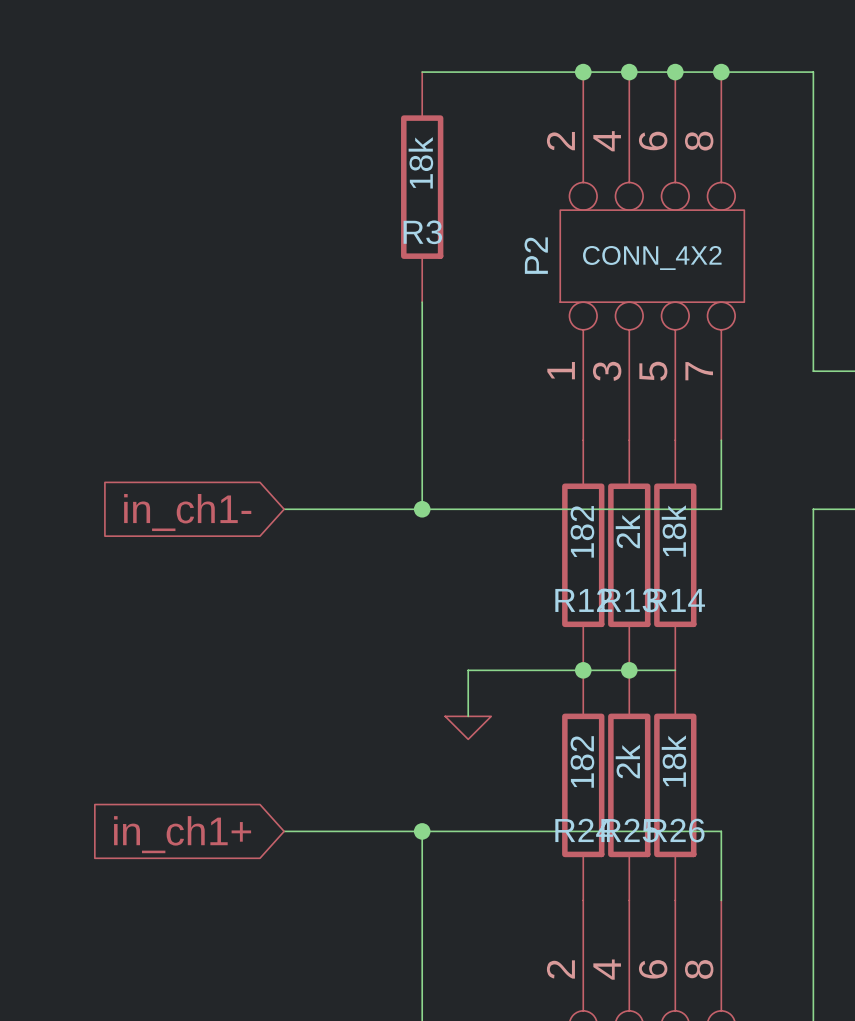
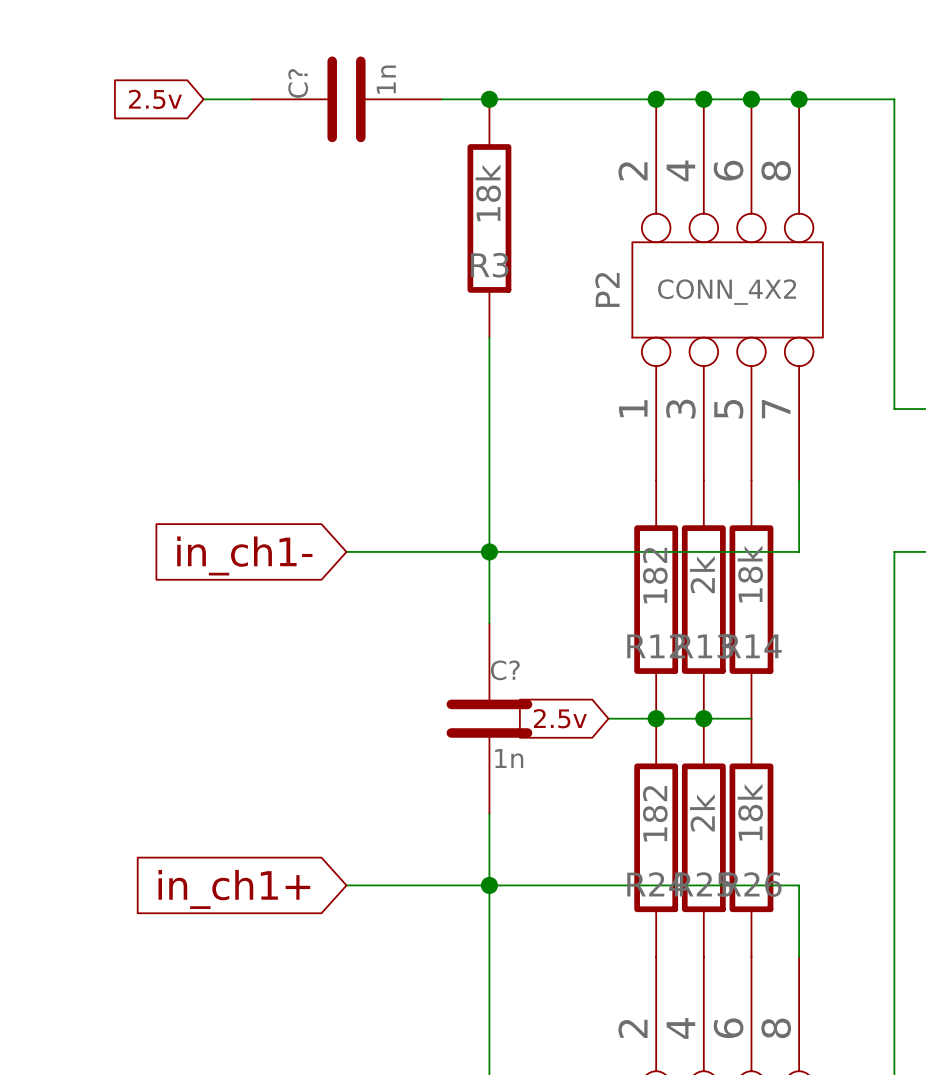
global label: none -> 2.5v (155, 99)
wire: none -> (203, 99) (251, 99)
C?: none -> 1n (346, 99)
wire: none -> (441, 99) (489, 99)
junction: none -> (489, 99)
wire: none -> (489, 551) (489, 623)
C?: none -> 1n (489, 718)
global label: none -> 2.5v (560, 718)
wire: (537, 670) (468, 670) (468, 716) -> none
power symbol: (468, 727) -> none
wire: none -> (489, 813) (489, 885)

